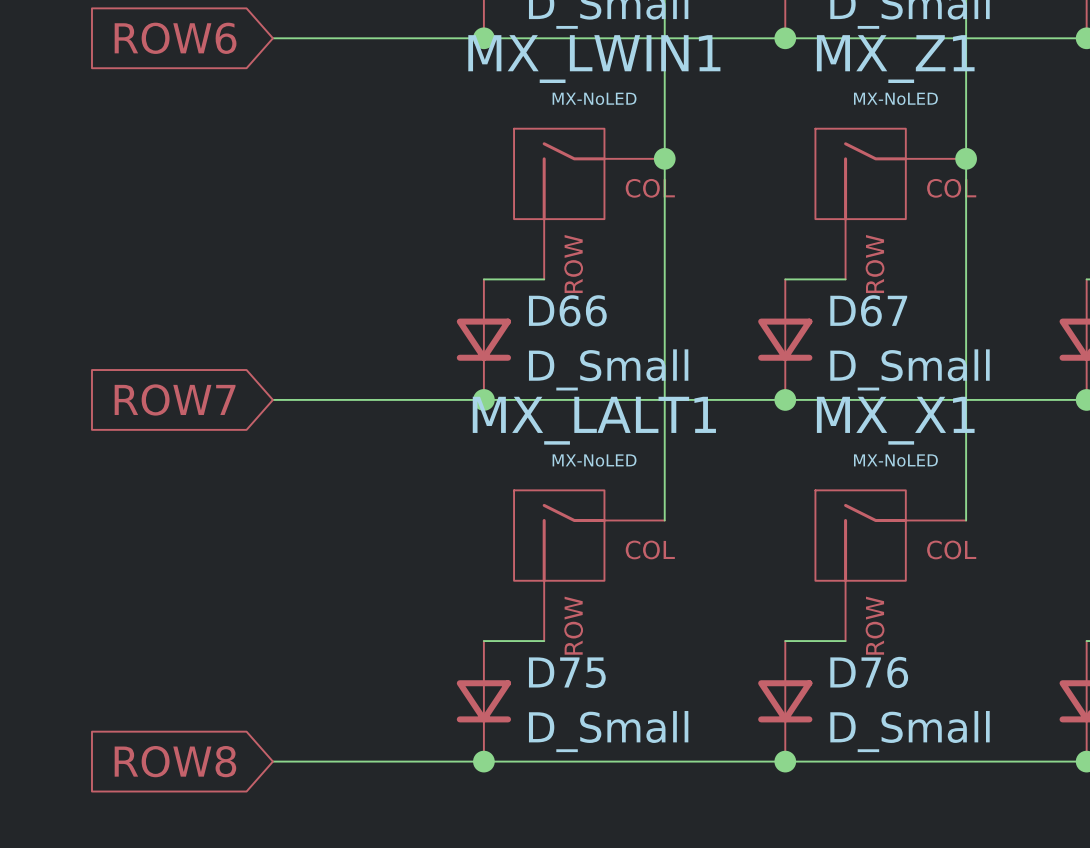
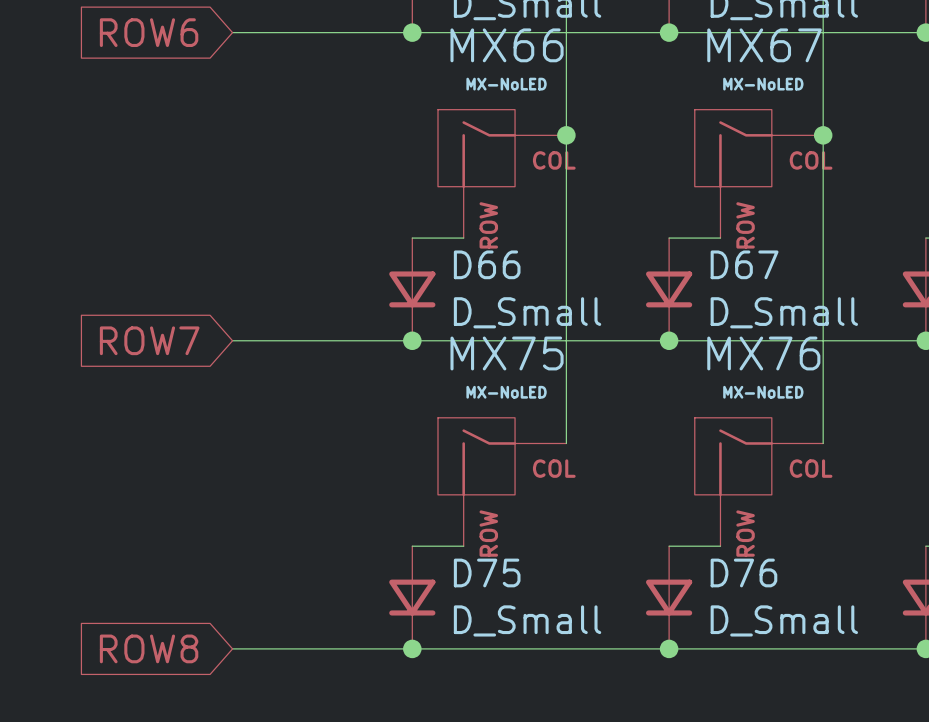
MX_LWIN1 name: MX_LWIN1 (594, 59) -> MX66 (507, 45)
MX_Z1 name: MX_Z1 (895, 59) -> MX67 (764, 45)
MX_LALT1 name: MX_LALT1 (594, 420) -> MX75 (507, 353)
MX_X1 name: MX_X1 (895, 420) -> MX76 (763, 353)

